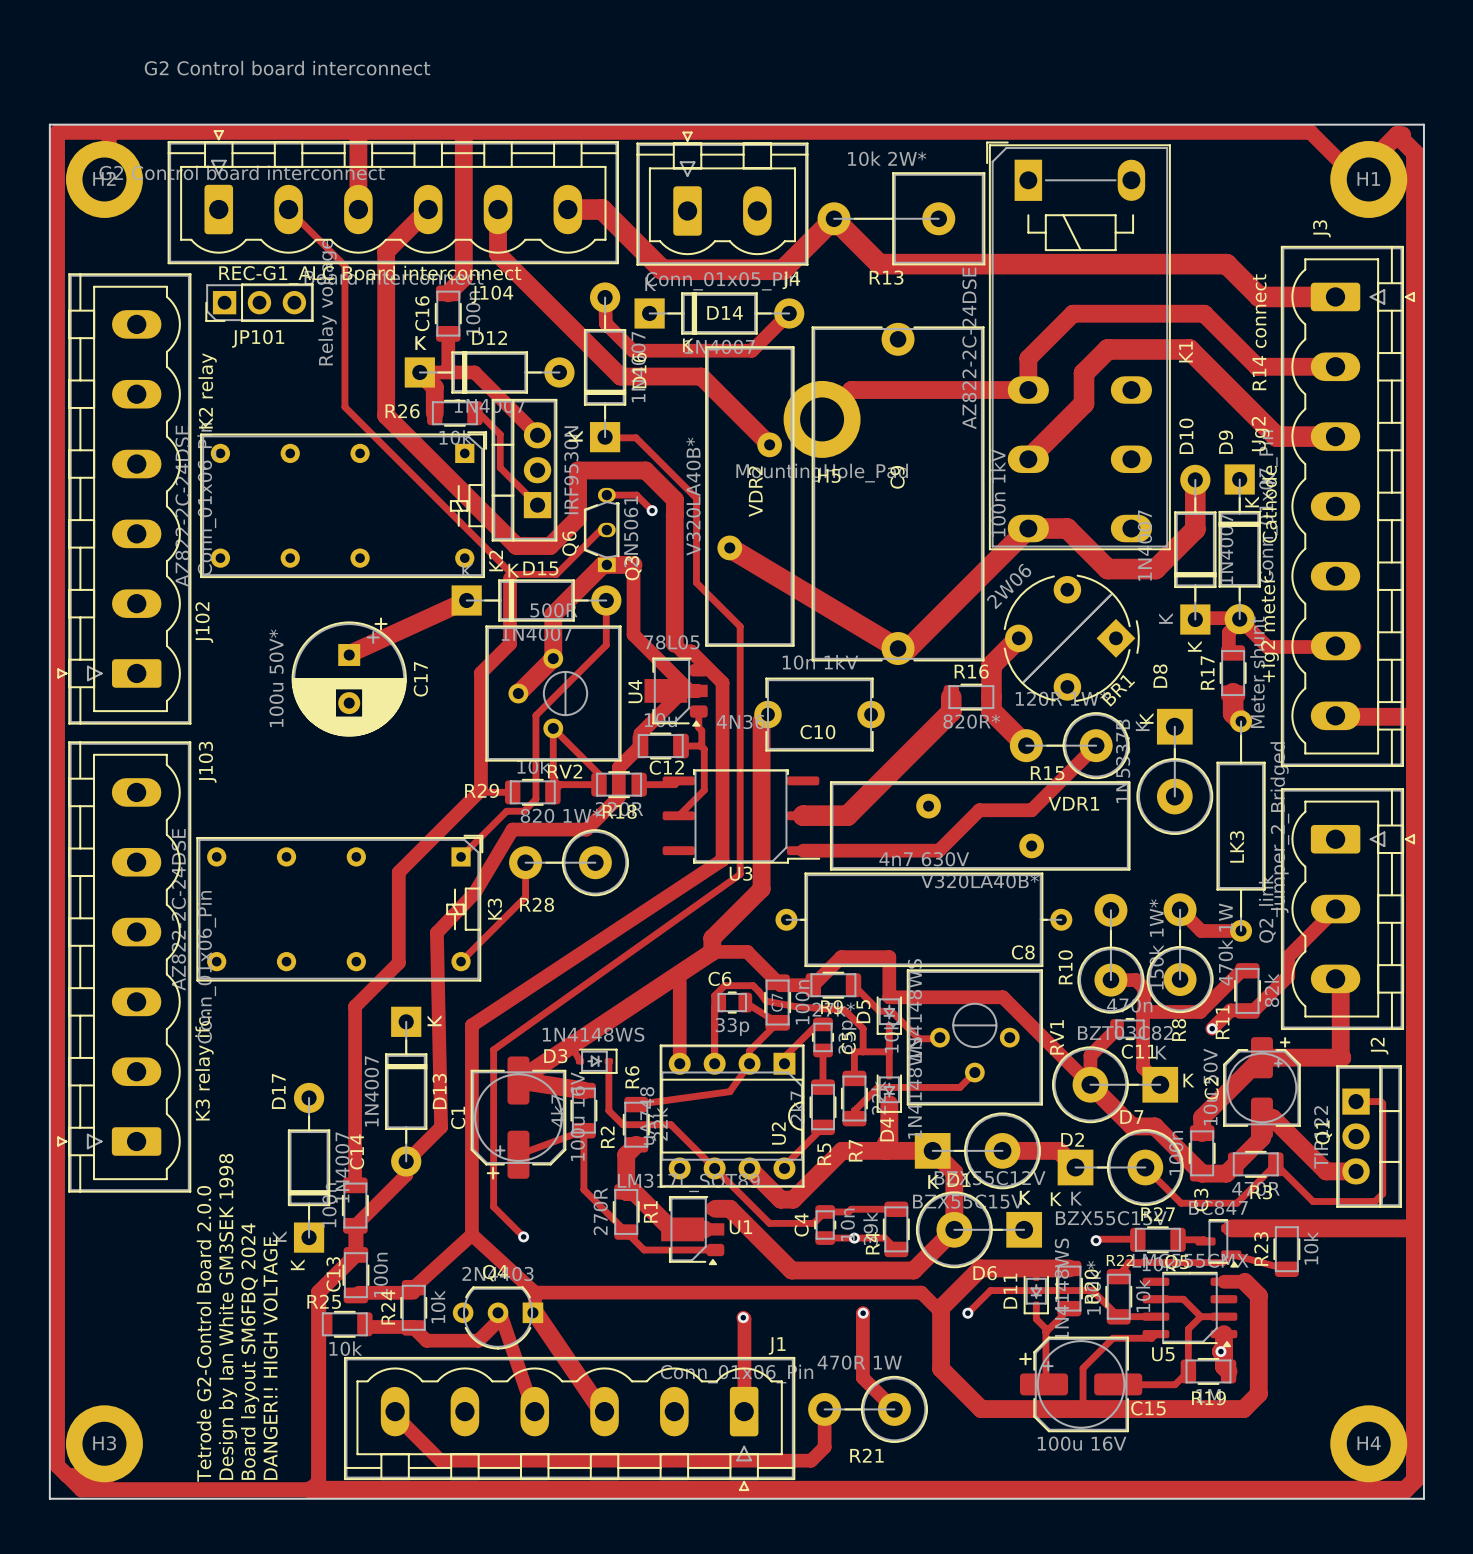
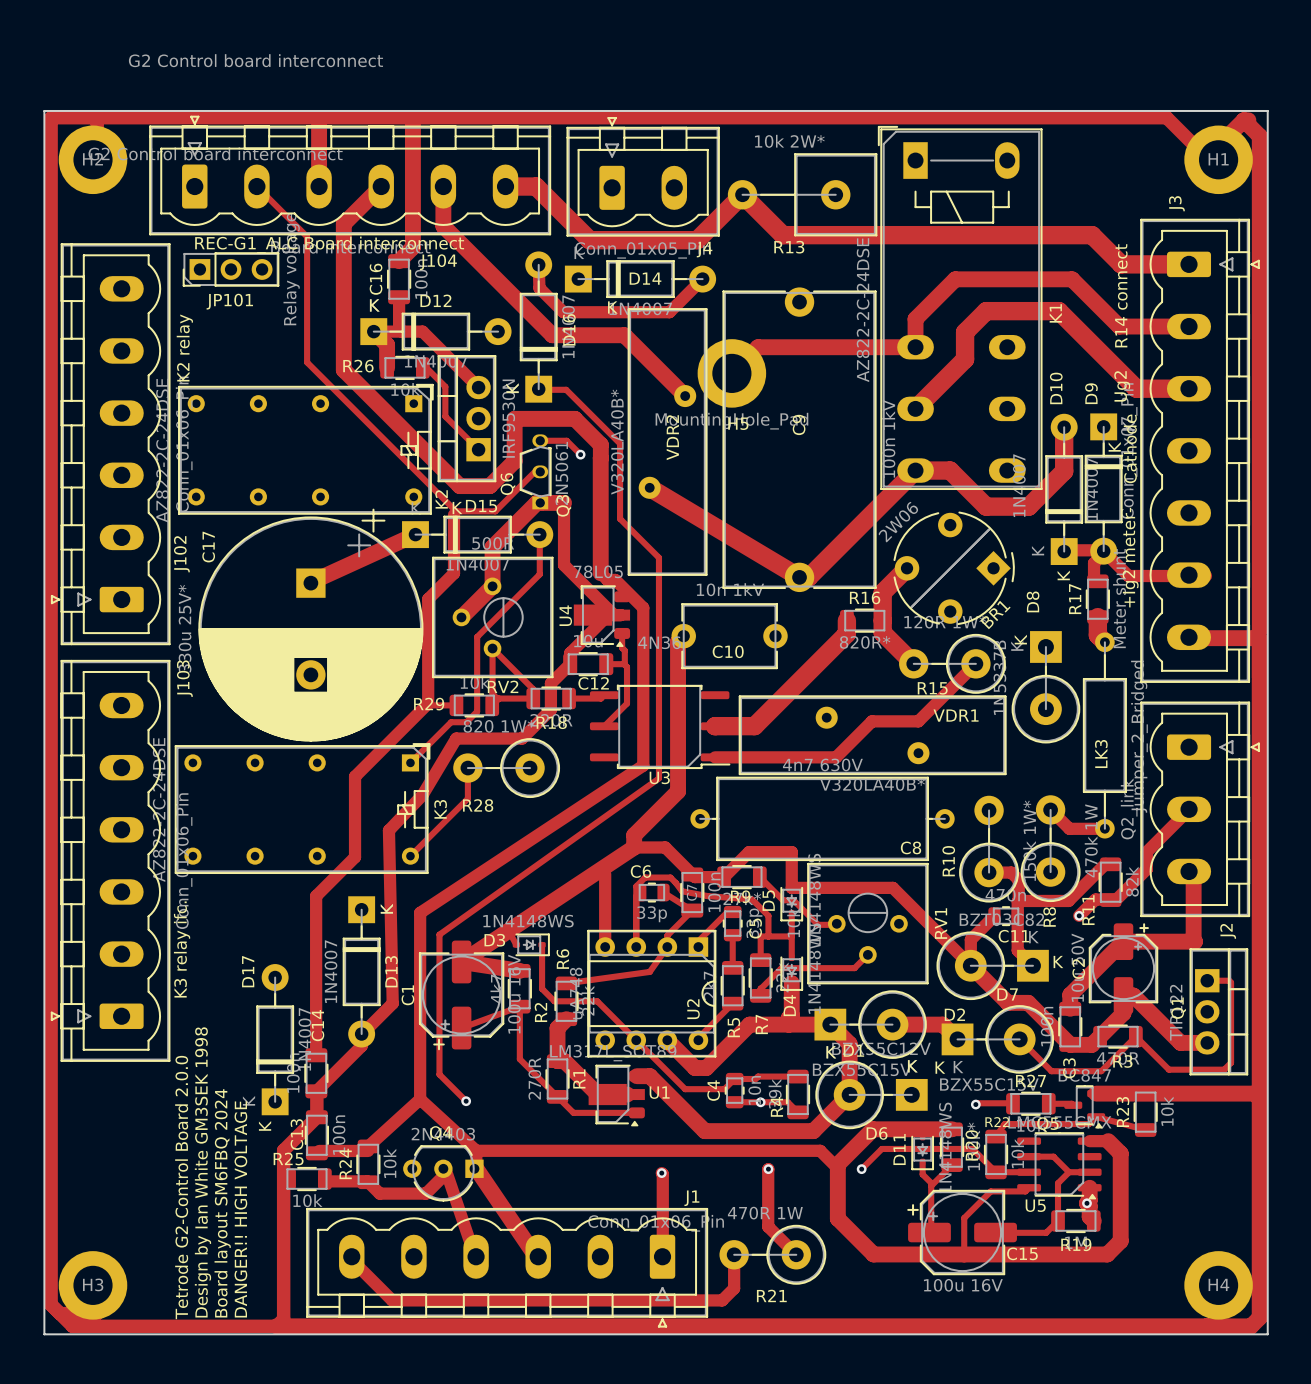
C17 footprint: [291, 617, 407, 737] -> [198, 508, 424, 742]
C17 value: 100u 50V* (276, 678) -> 330u 25V* (185, 628)
C17 name position: C17 (420, 679) -> C17 (208, 547)

